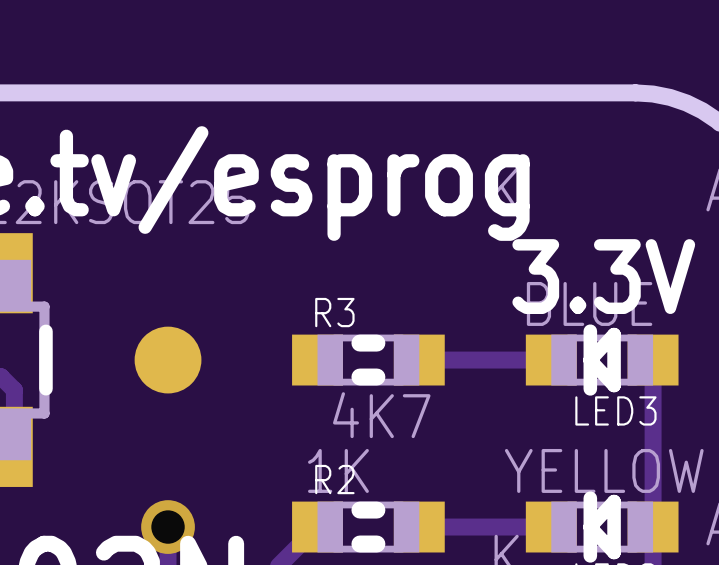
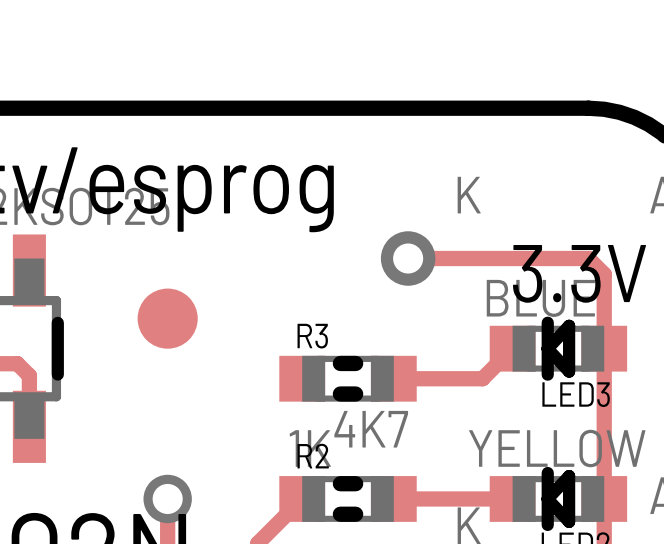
track: none -> (408, 258) (588, 258) (604, 274) (604, 348)
via: none -> (408, 258)
part position: (168, 360) -> (167, 318)
R3 position: (368, 360) -> (348, 378)
track: (419, 360) (551, 360) -> (393, 378) (482, 378) (512, 348)

